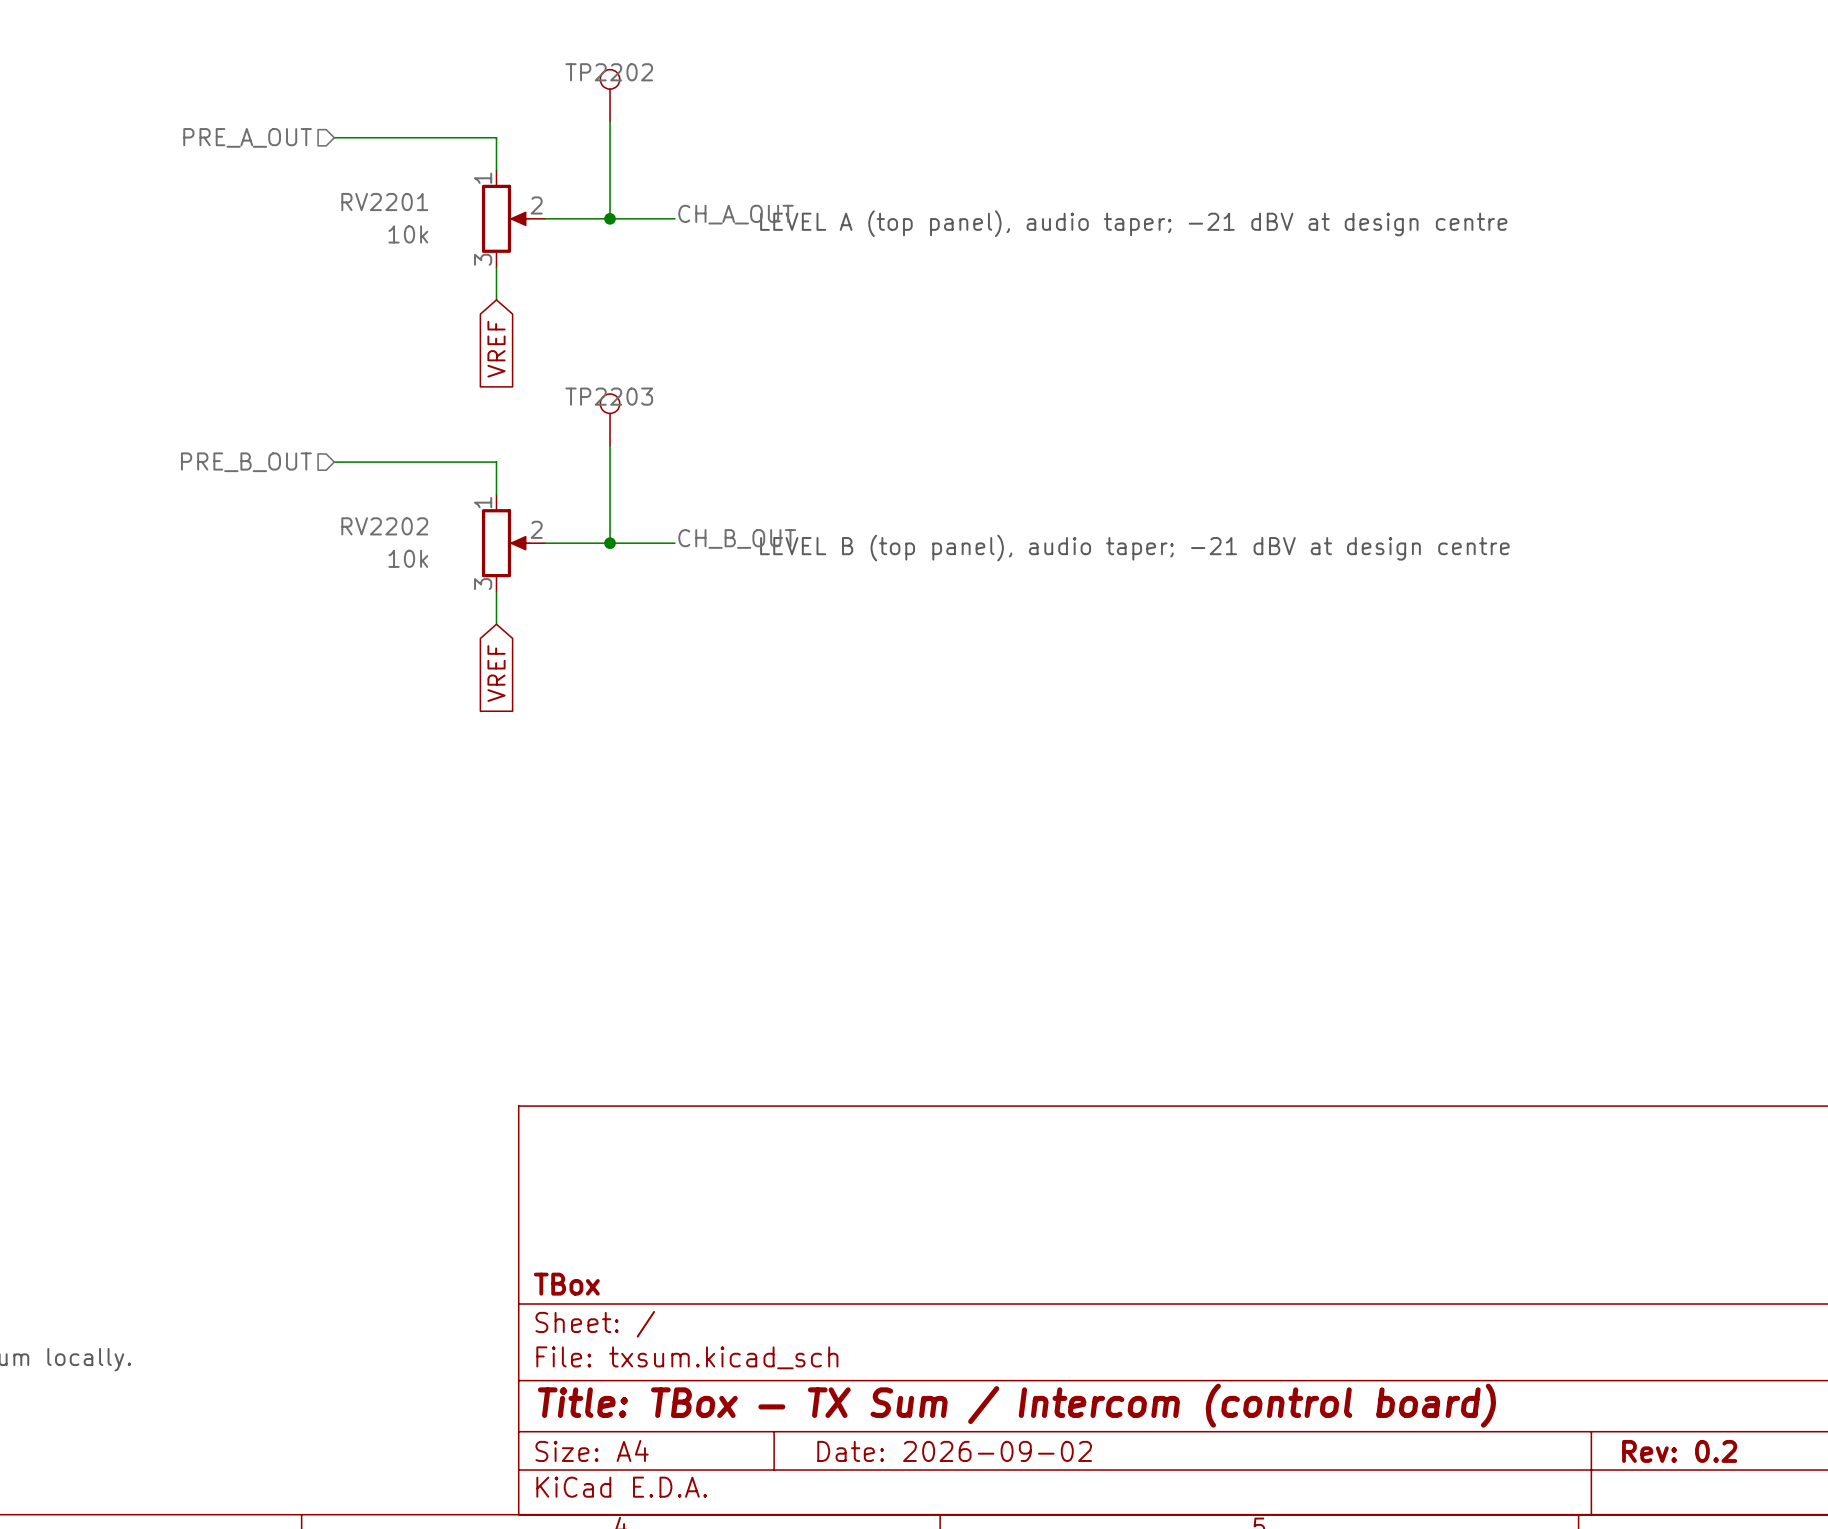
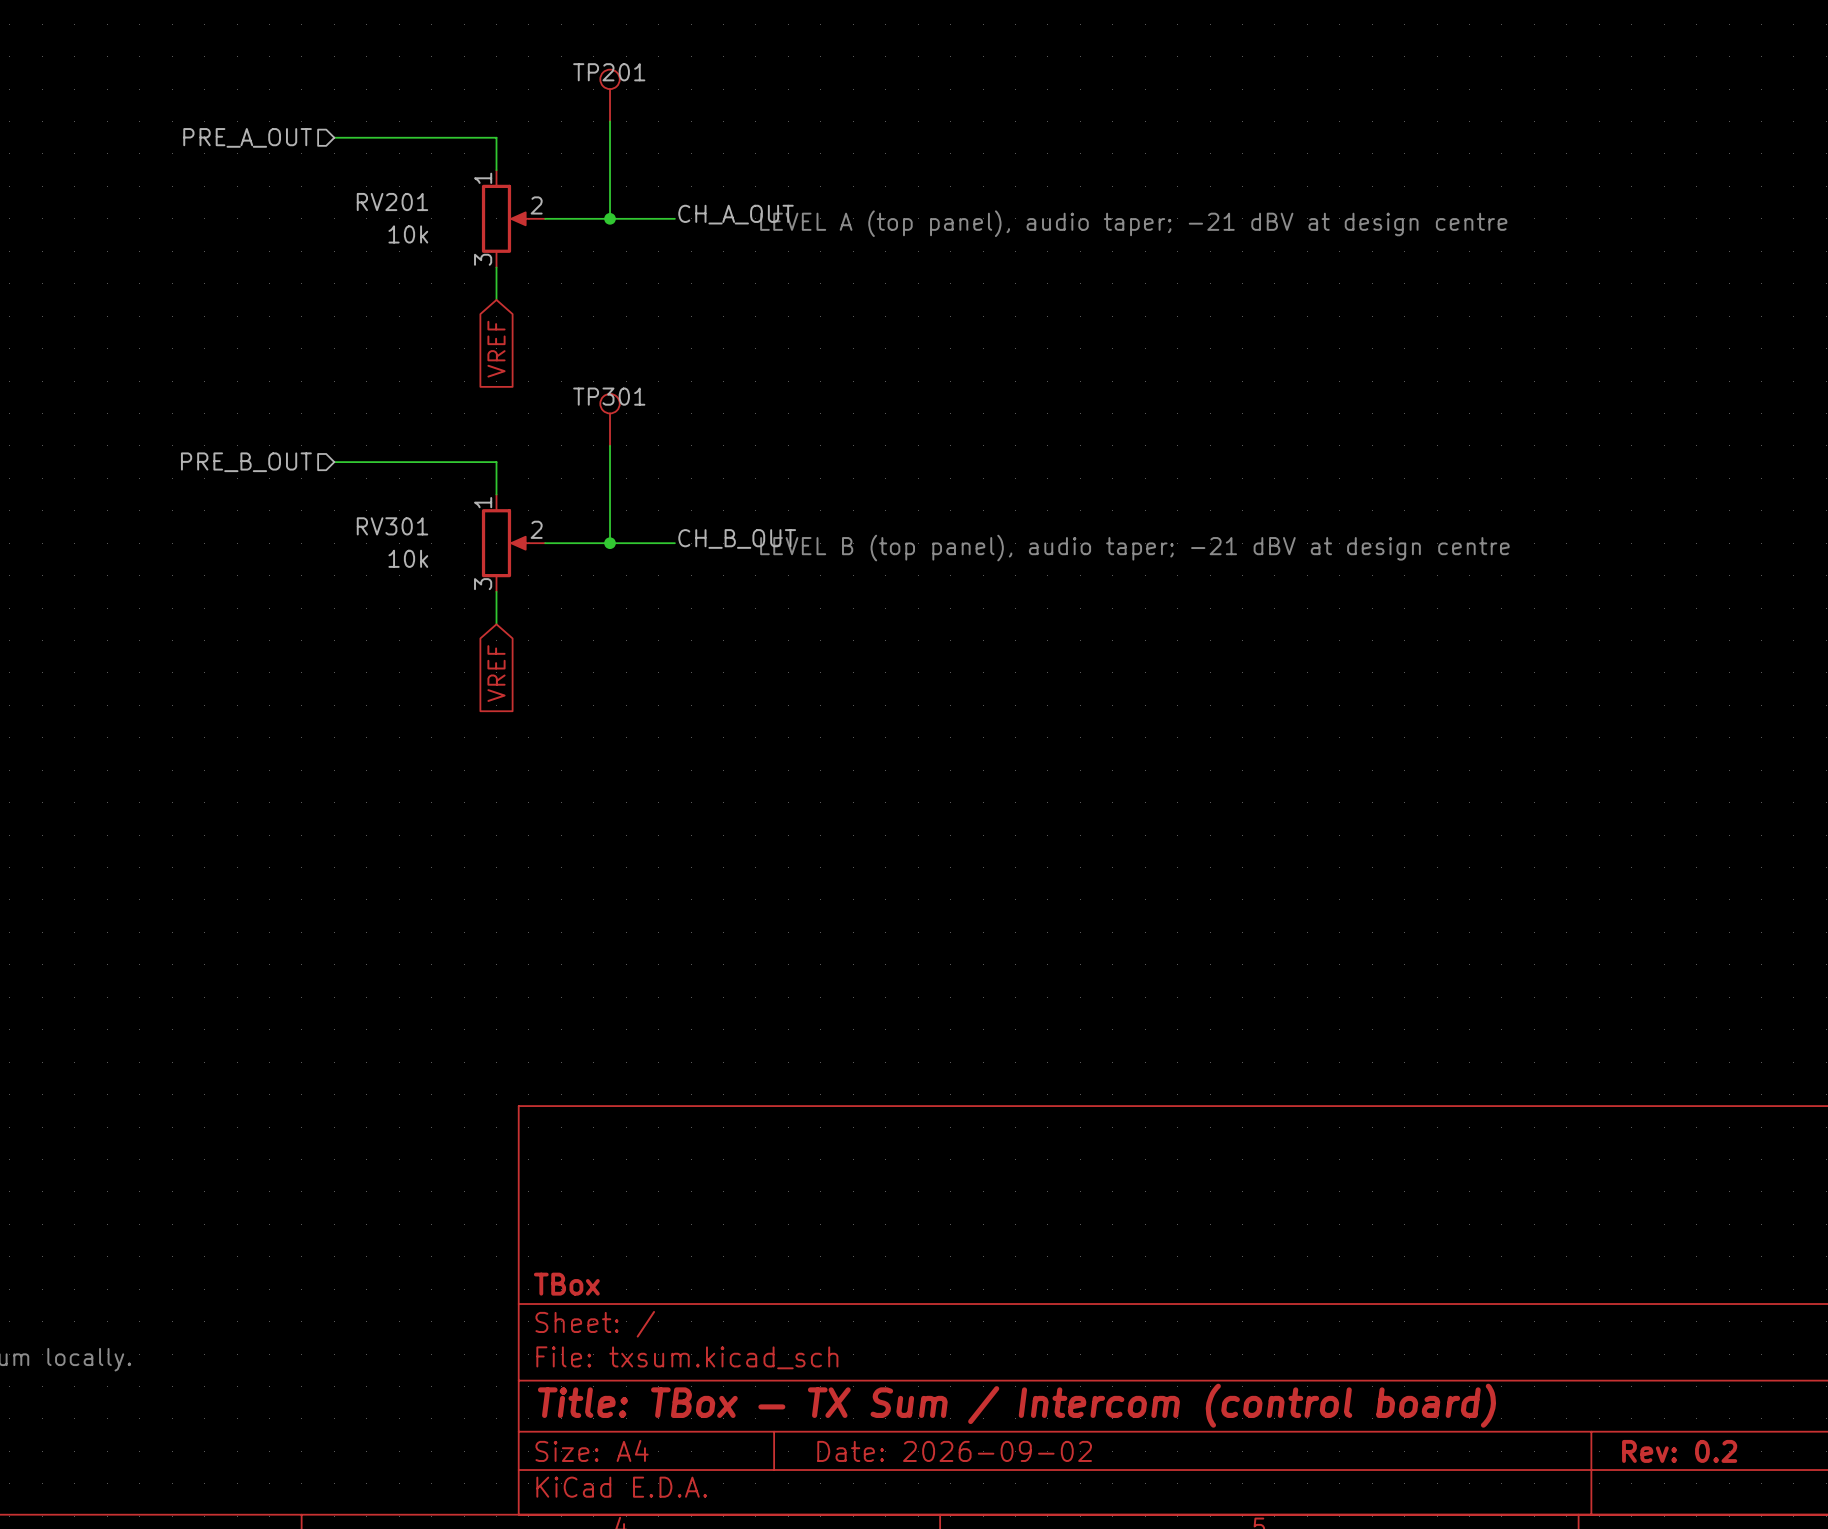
TP2202 name: TP2202 (609, 72) -> TP201 (609, 72)
RV2201 name: RV2201 (384, 202) -> RV201 (392, 202)
TP2203 name: TP2203 (609, 396) -> TP301 (609, 396)
RV2202 name: RV2202 (384, 526) -> RV301 (392, 526)

